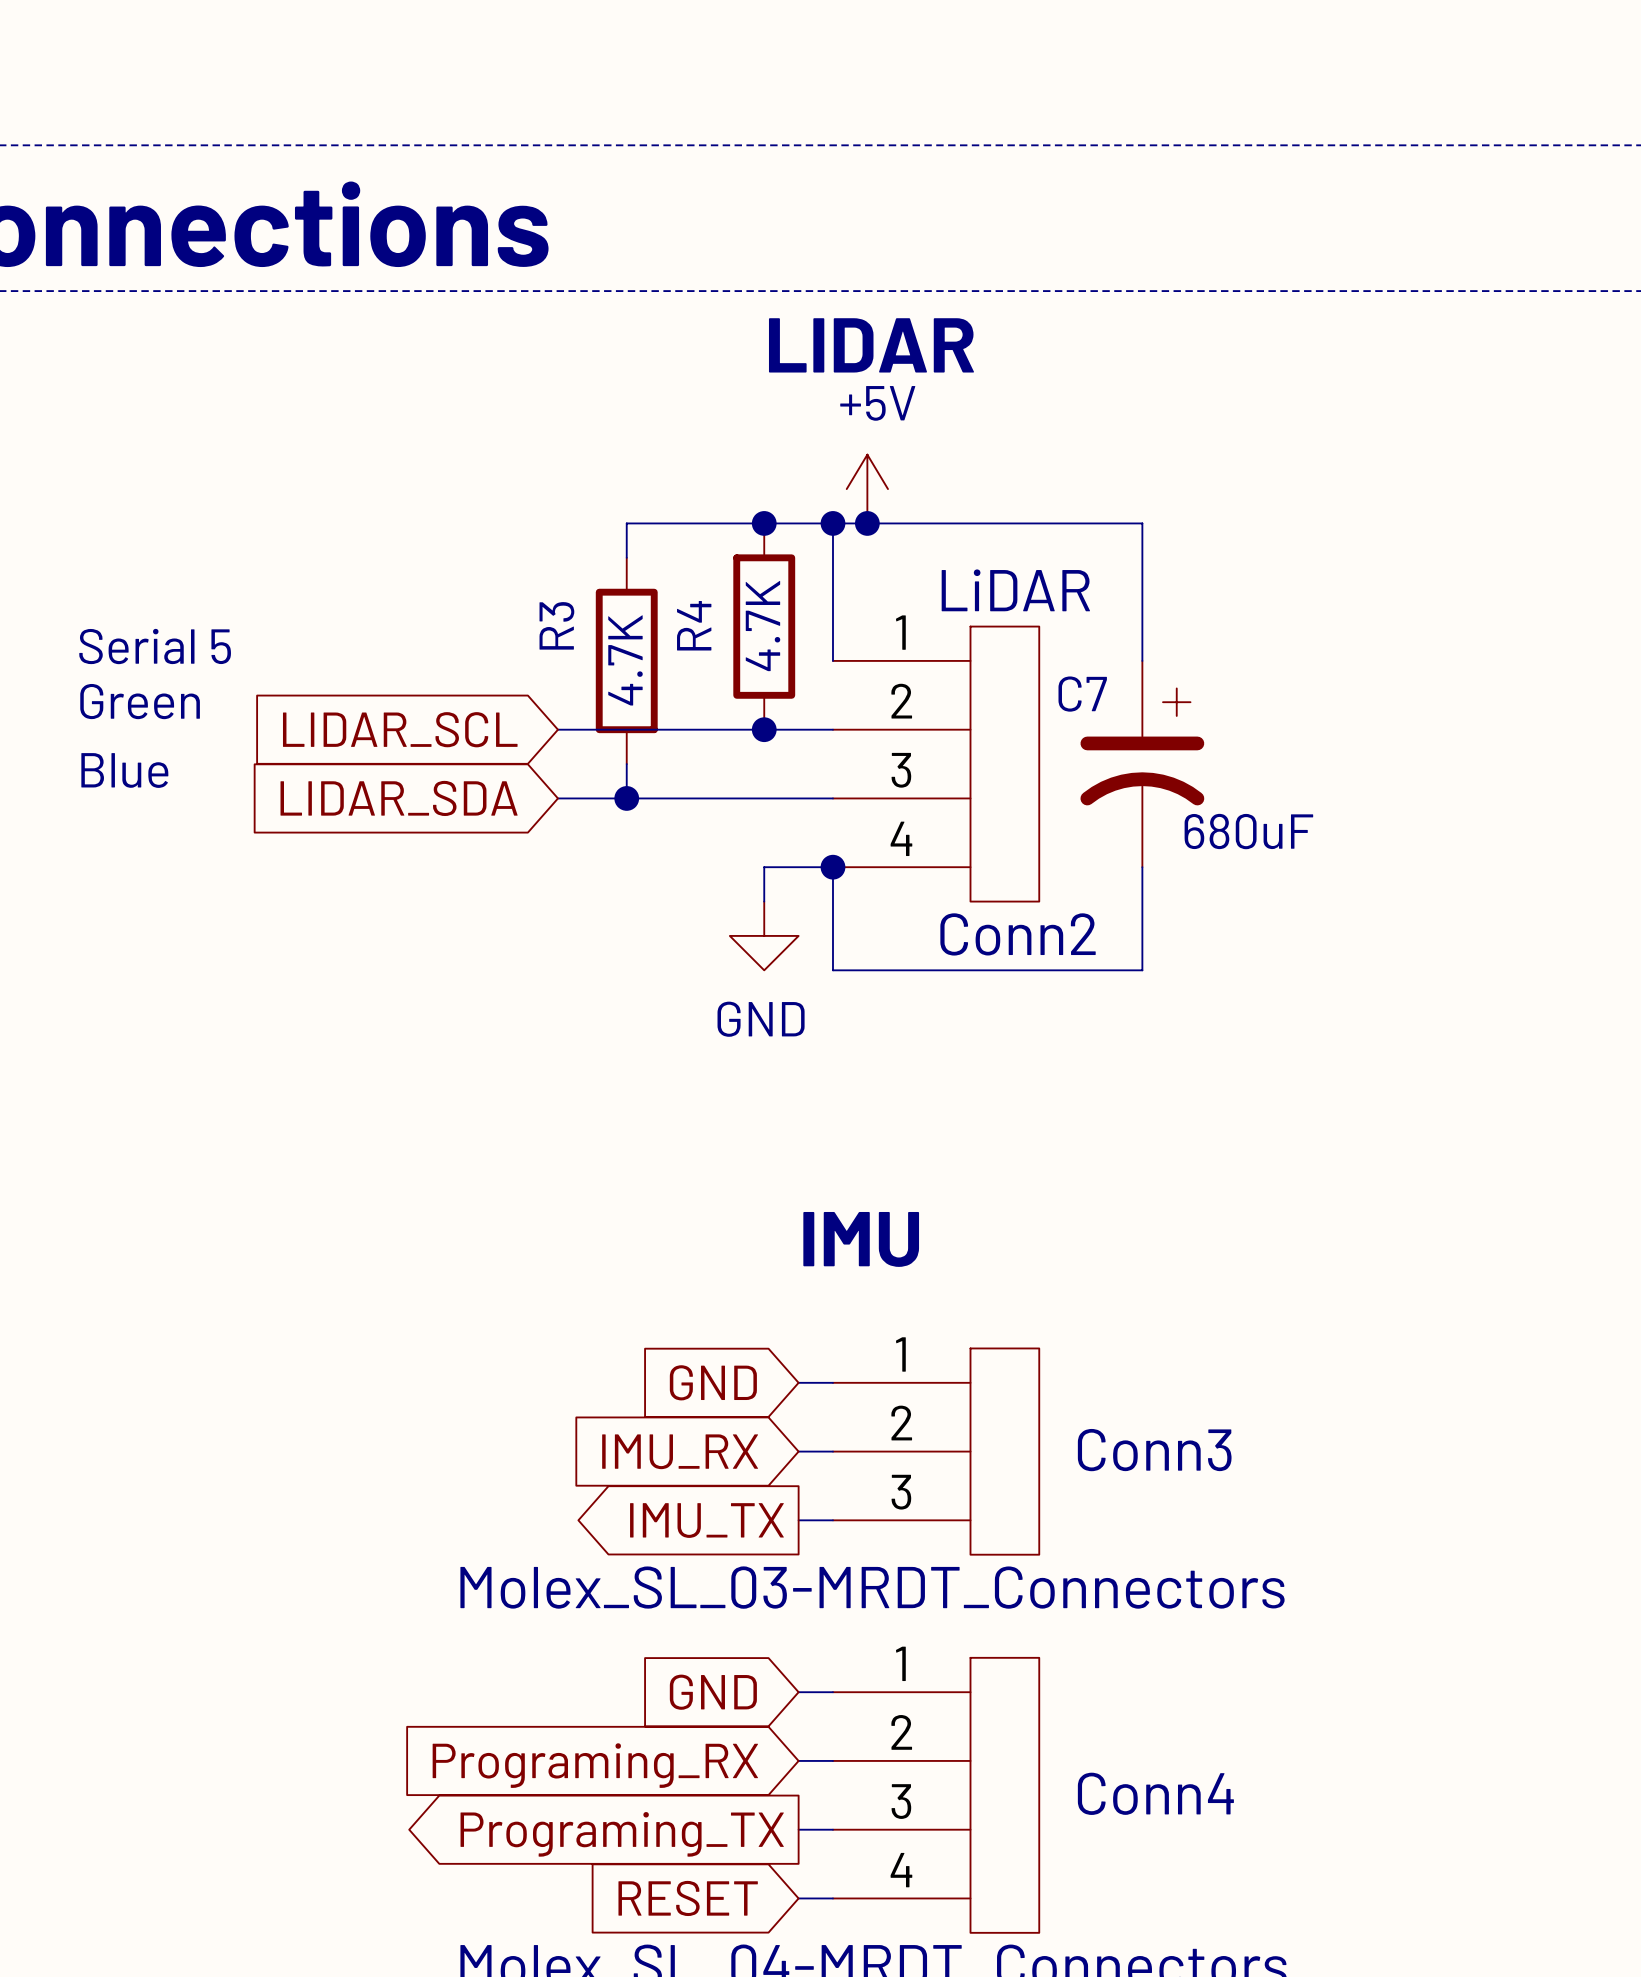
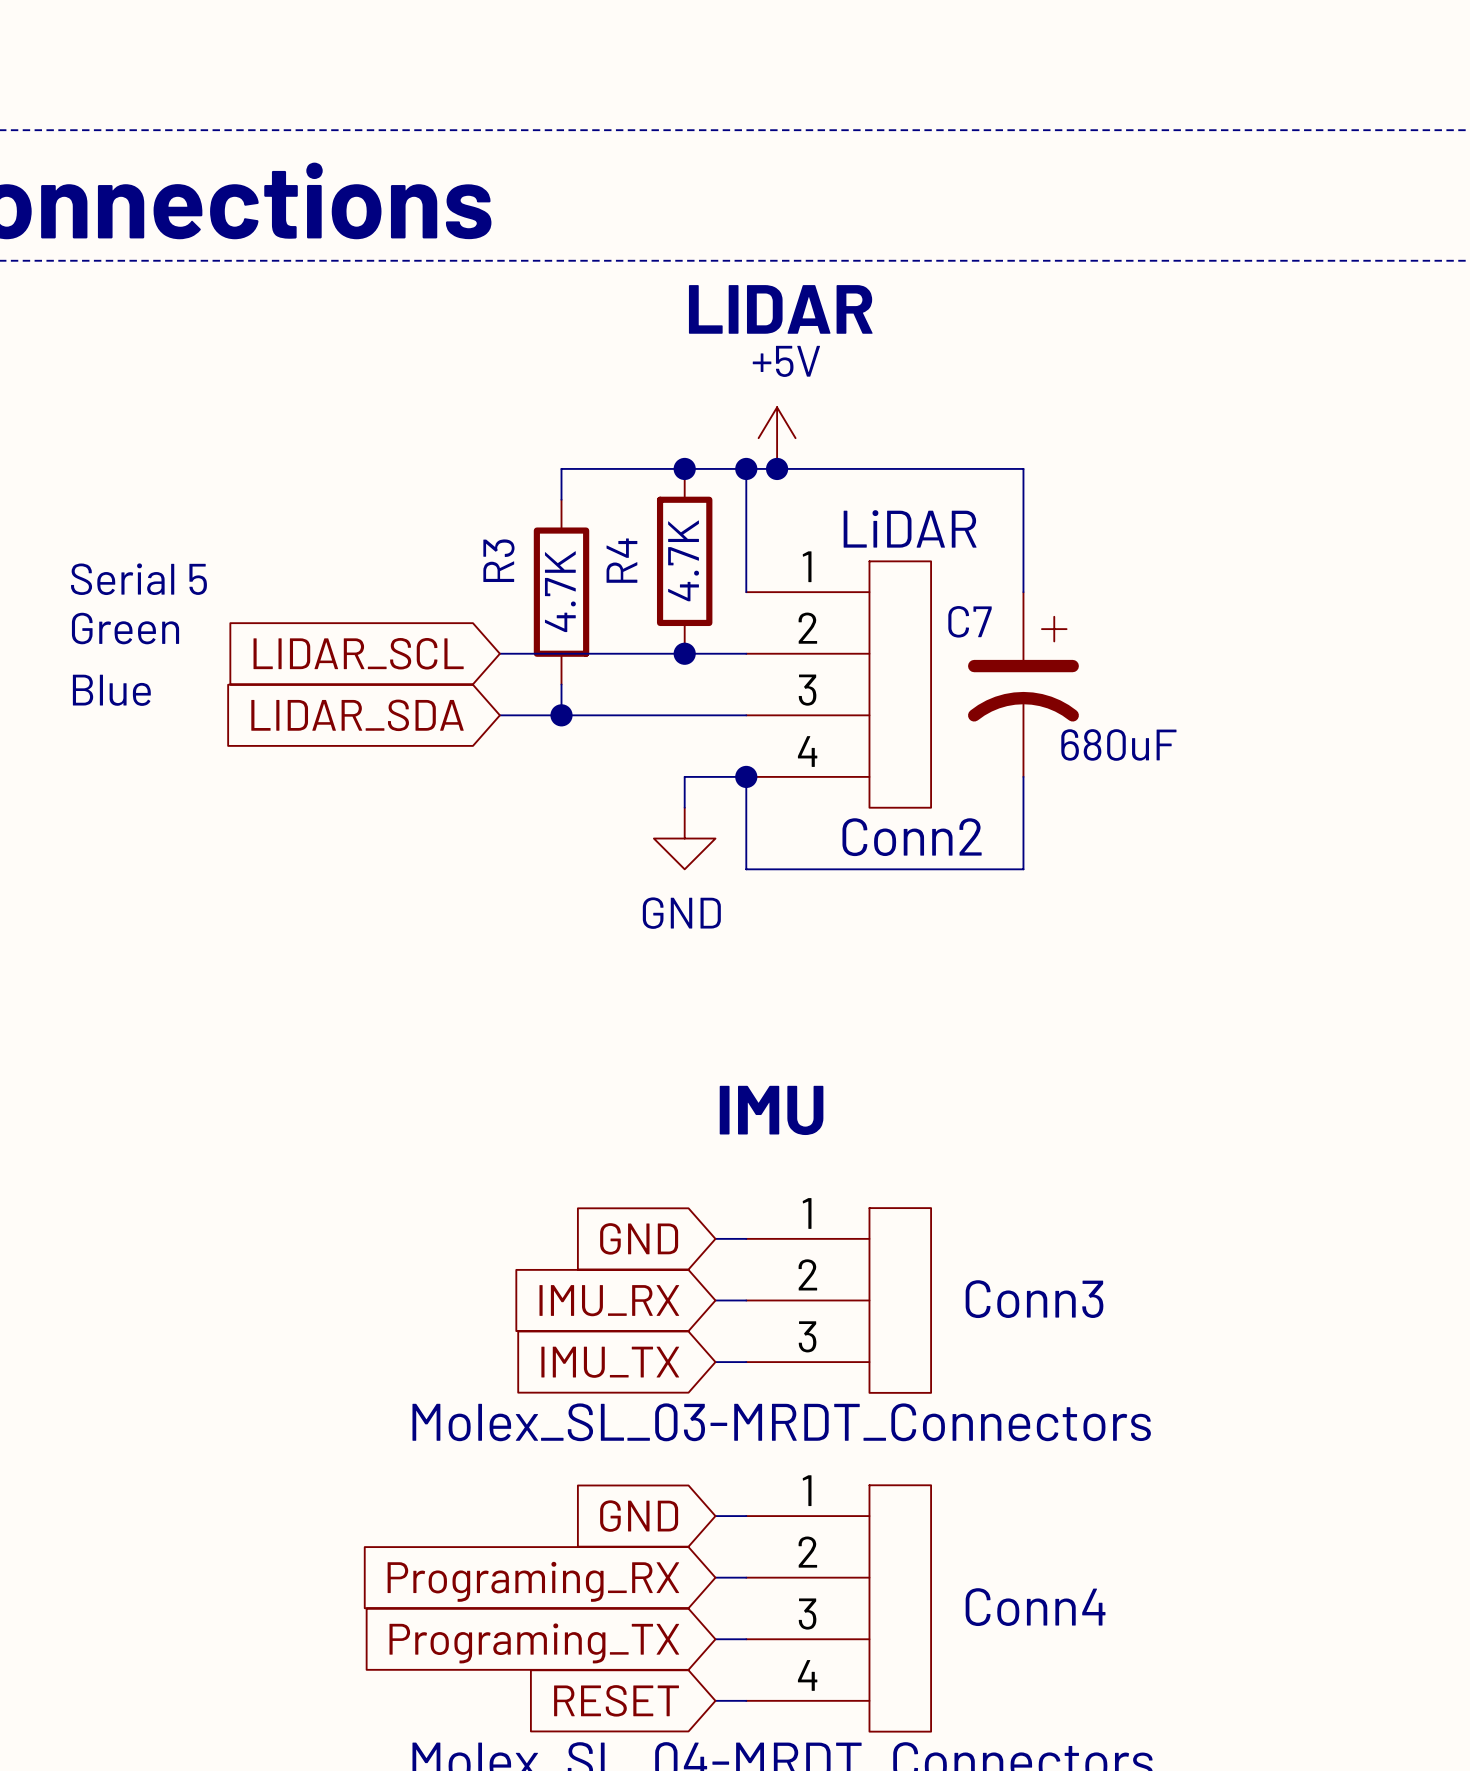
global label shape: output (706, 1520) -> input (610, 1362)
global label shape: output (622, 1834) -> input (534, 1643)

